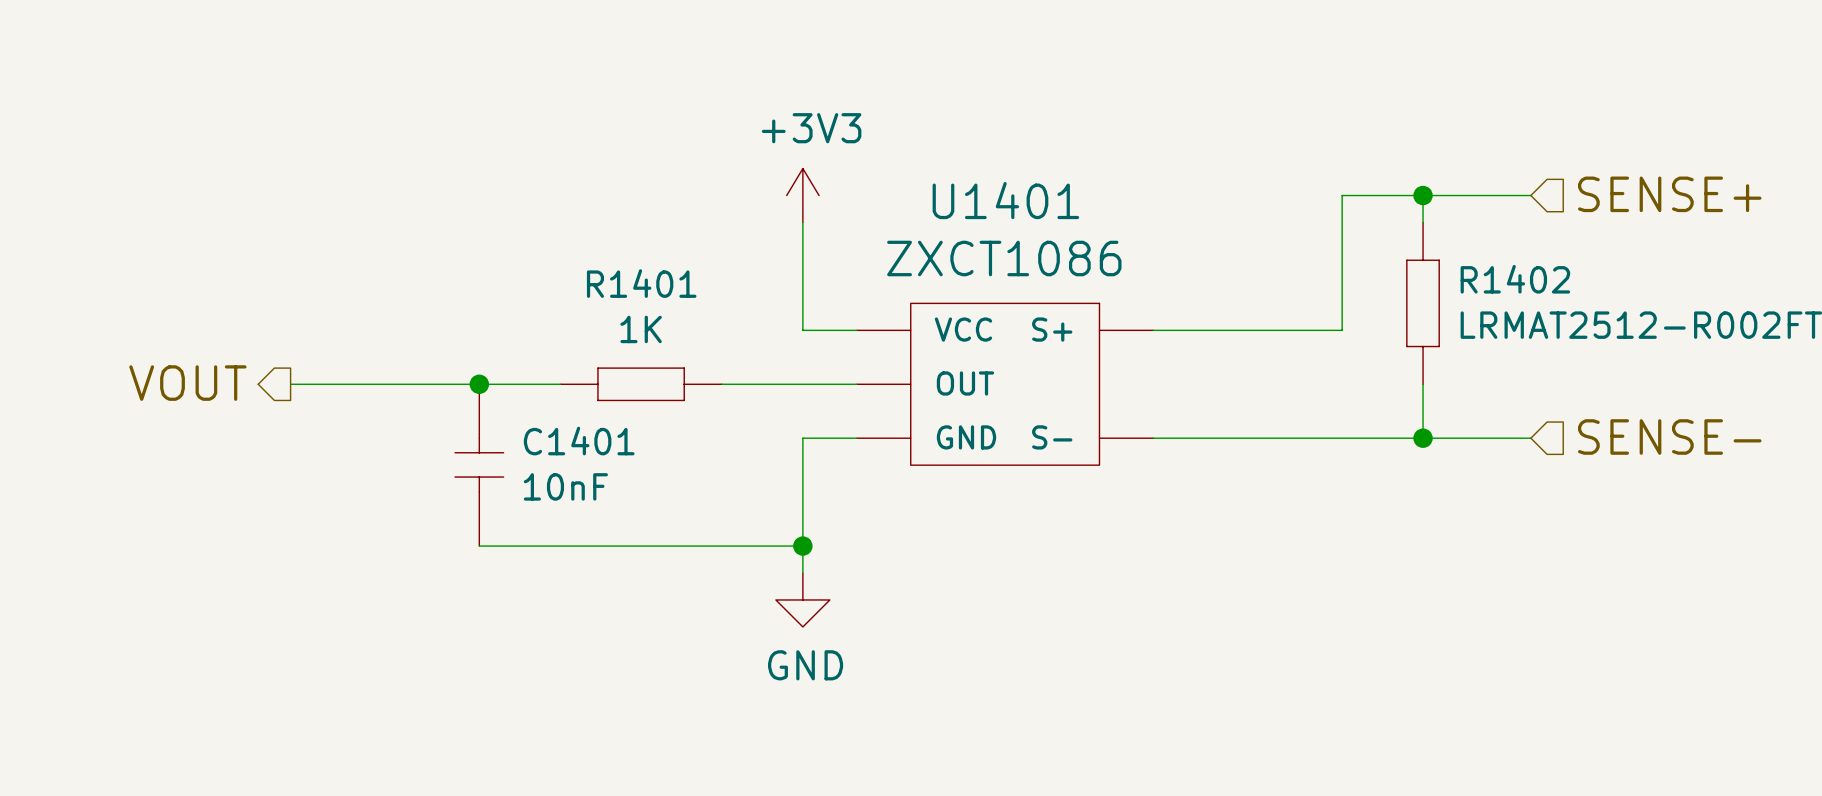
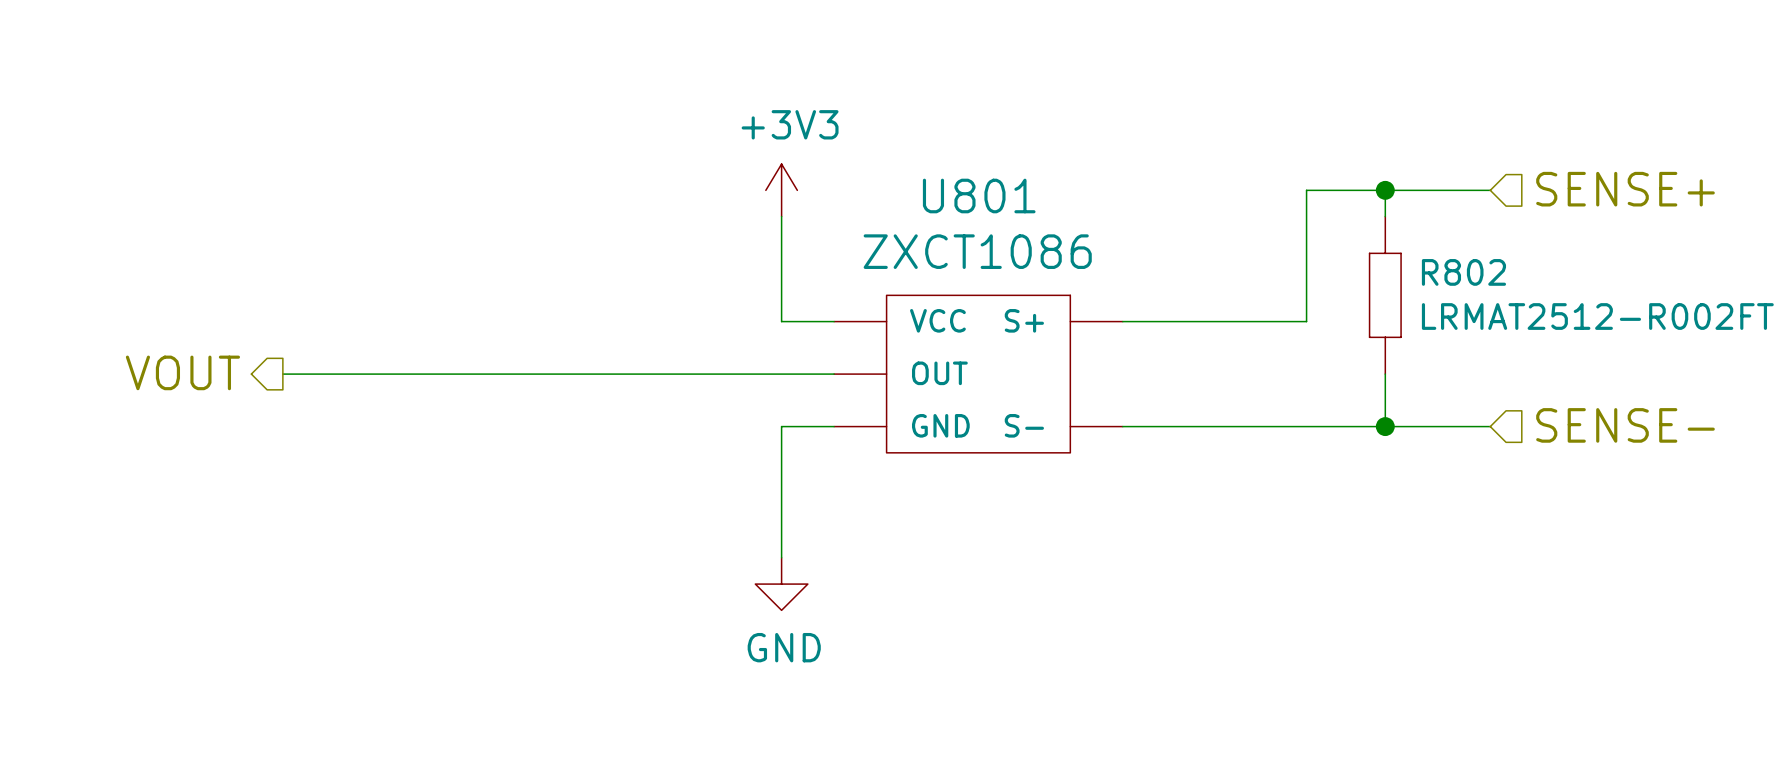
U1401 name: U1401 (1005, 200) -> U801 (979, 196)
R1402 name: R1402 (1515, 279) -> R802 (1463, 272)
junction: (479, 384) -> none
wire: none -> (545, 374) (702, 374)
R1401: 1K (641, 384) -> none
C1401: 10nF (479, 465) -> none
wire: (479, 546) (802, 546) -> none
junction: (802, 546) -> none

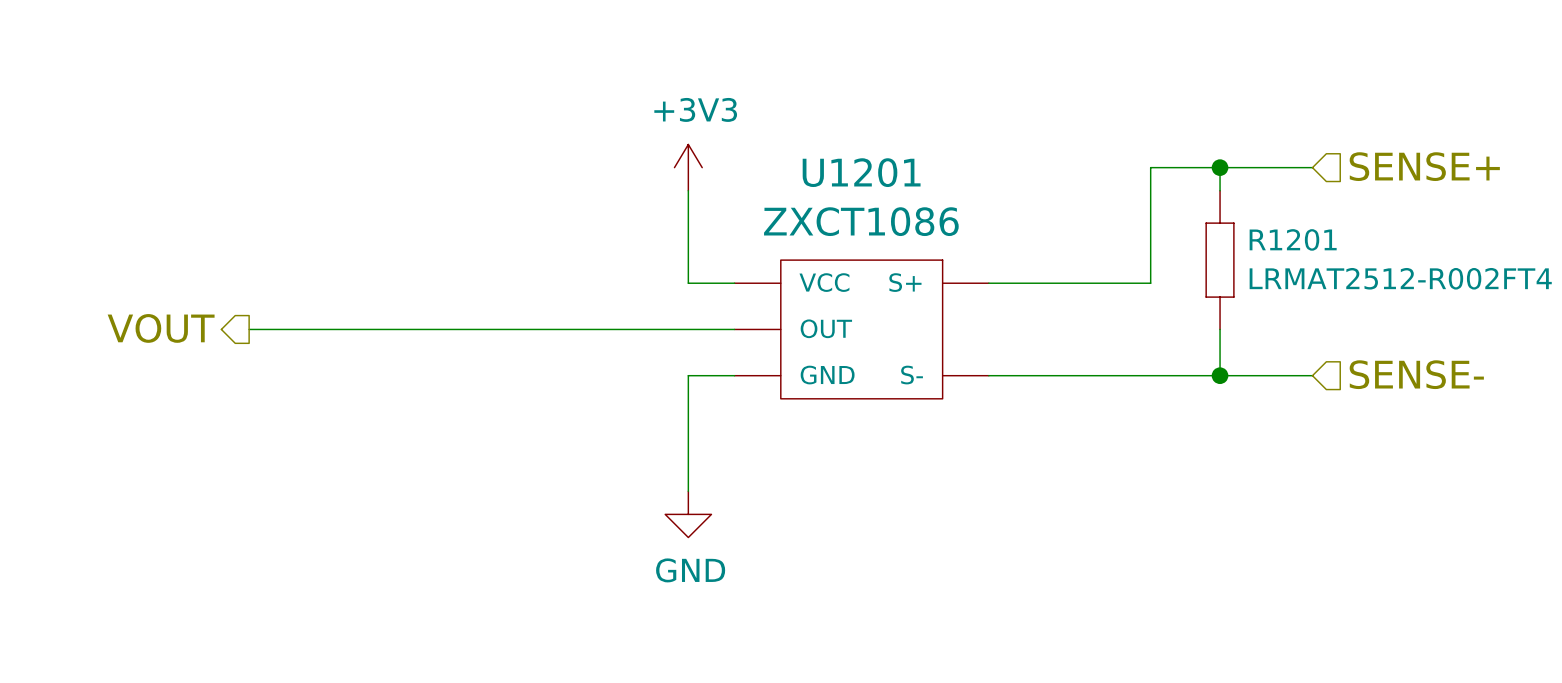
U801 name: U801 (979, 196) -> U1201 (861, 172)
R802 name: R802 (1463, 272) -> R1201 (1293, 239)

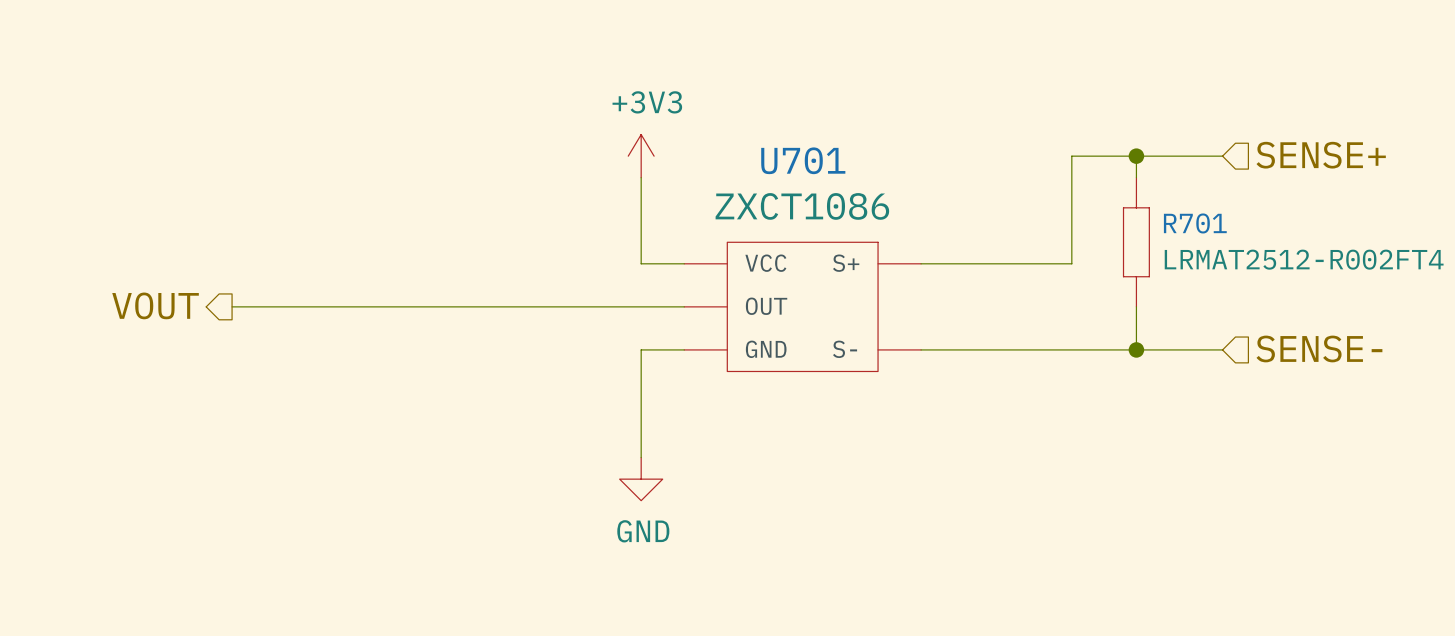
U1201 name: U1201 (861, 172) -> U701 (803, 160)
R1201 name: R1201 (1293, 239) -> R701 (1195, 223)

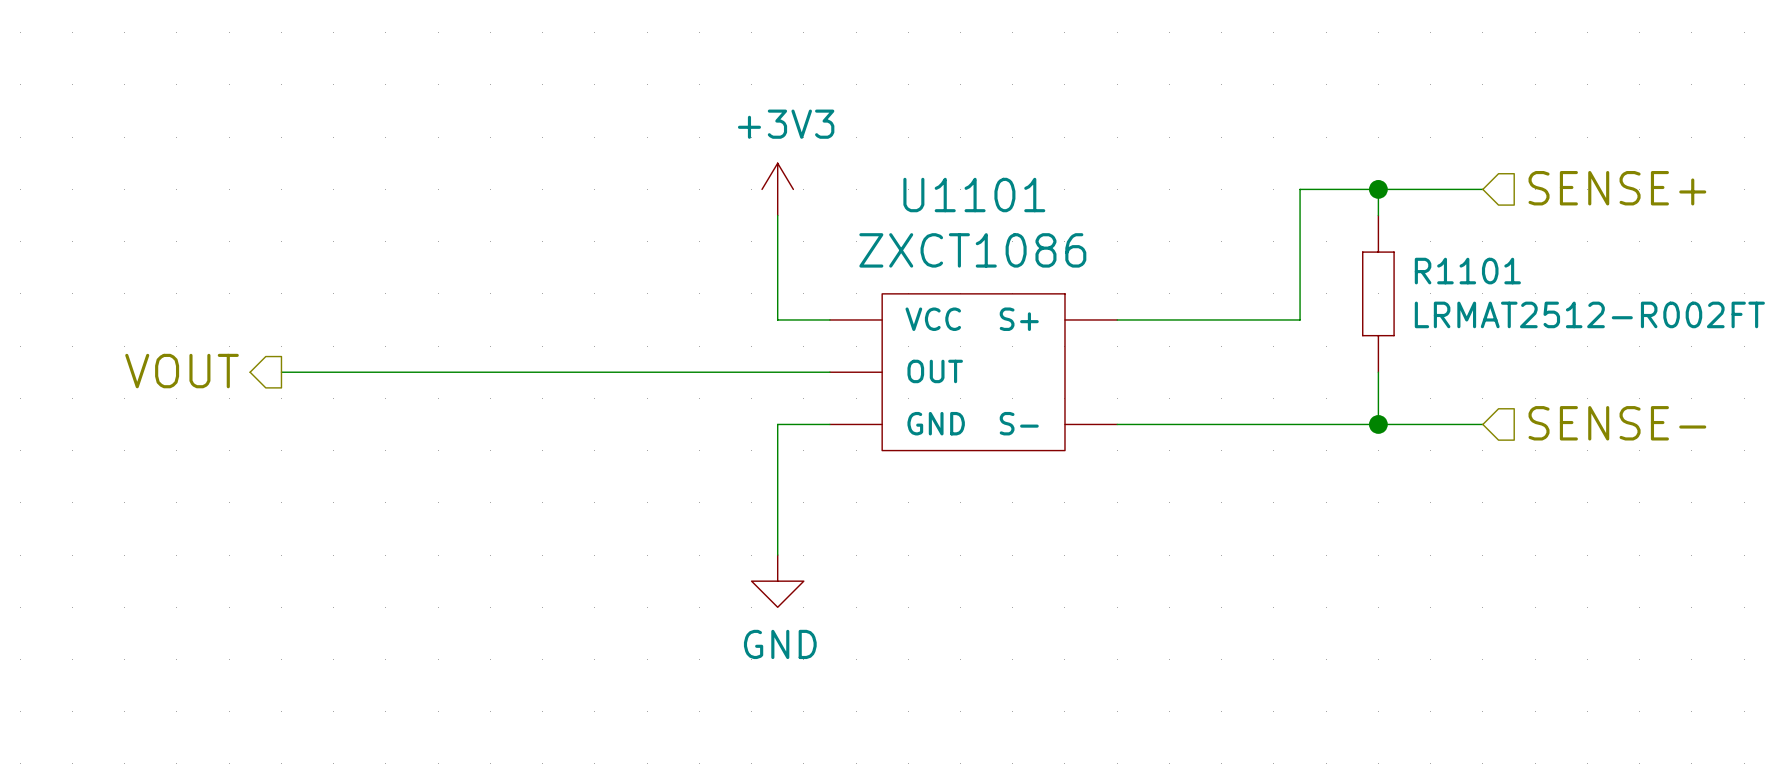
U701 name: U701 (803, 160) -> U1101 (974, 195)
R701 name: R701 (1195, 223) -> R1101 (1467, 271)

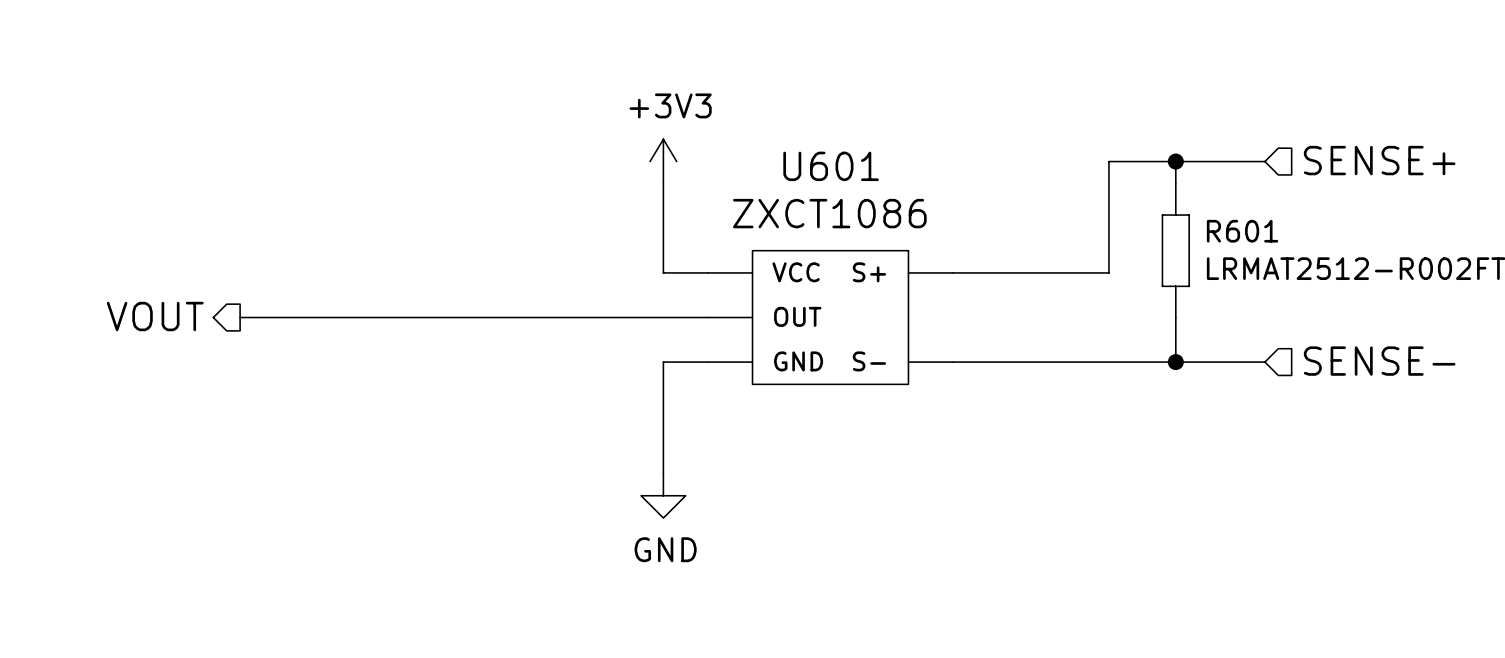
U1101 name: U1101 (974, 195) -> U601 (831, 166)
R1101 name: R1101 (1467, 271) -> R601 (1242, 231)

